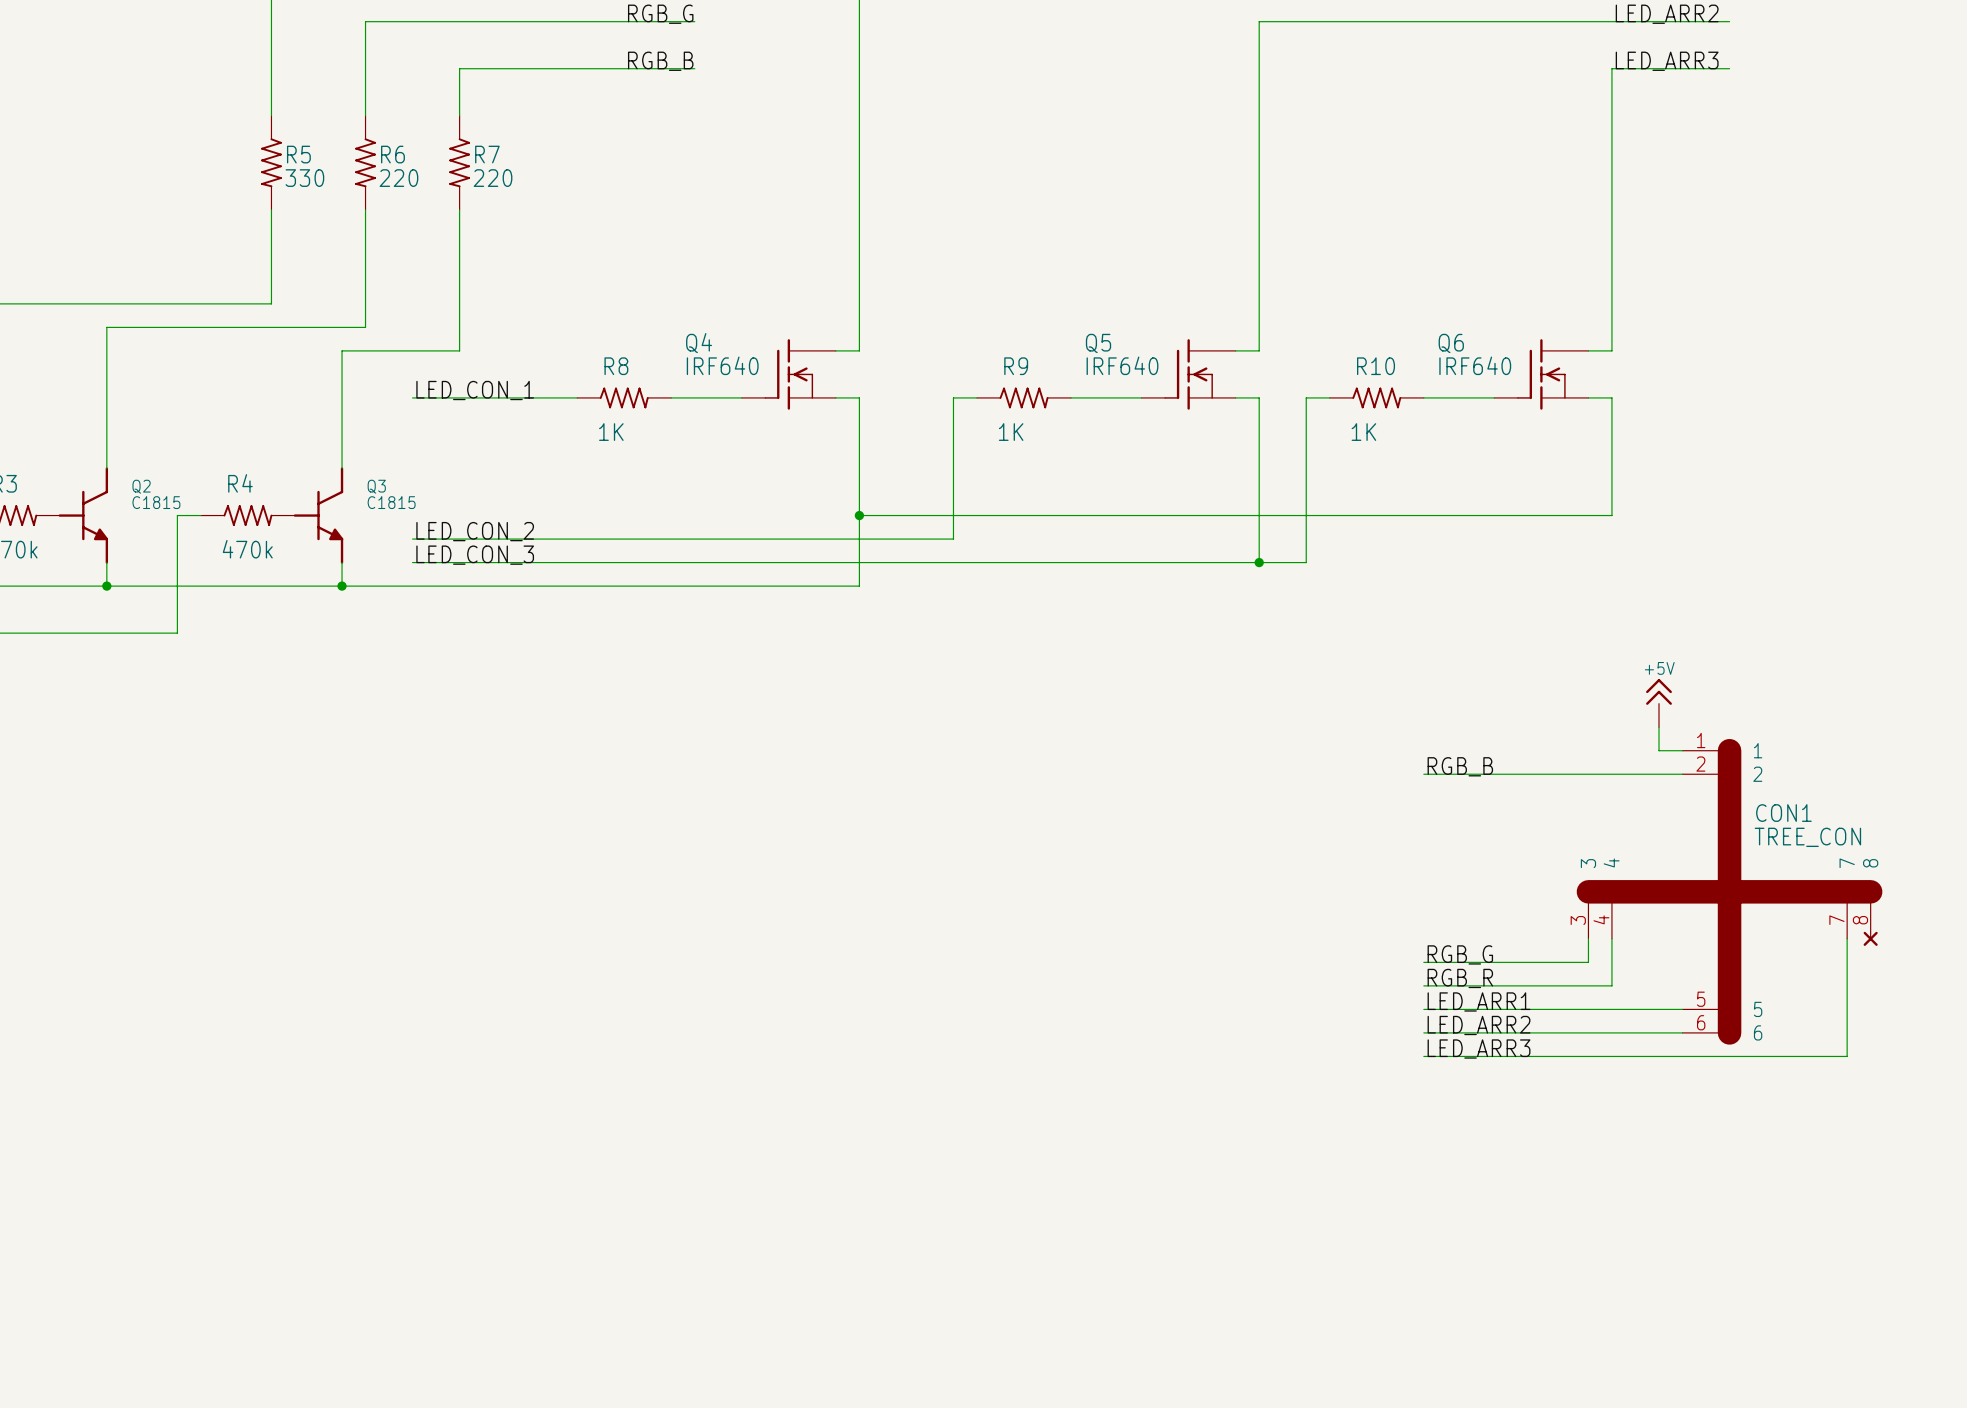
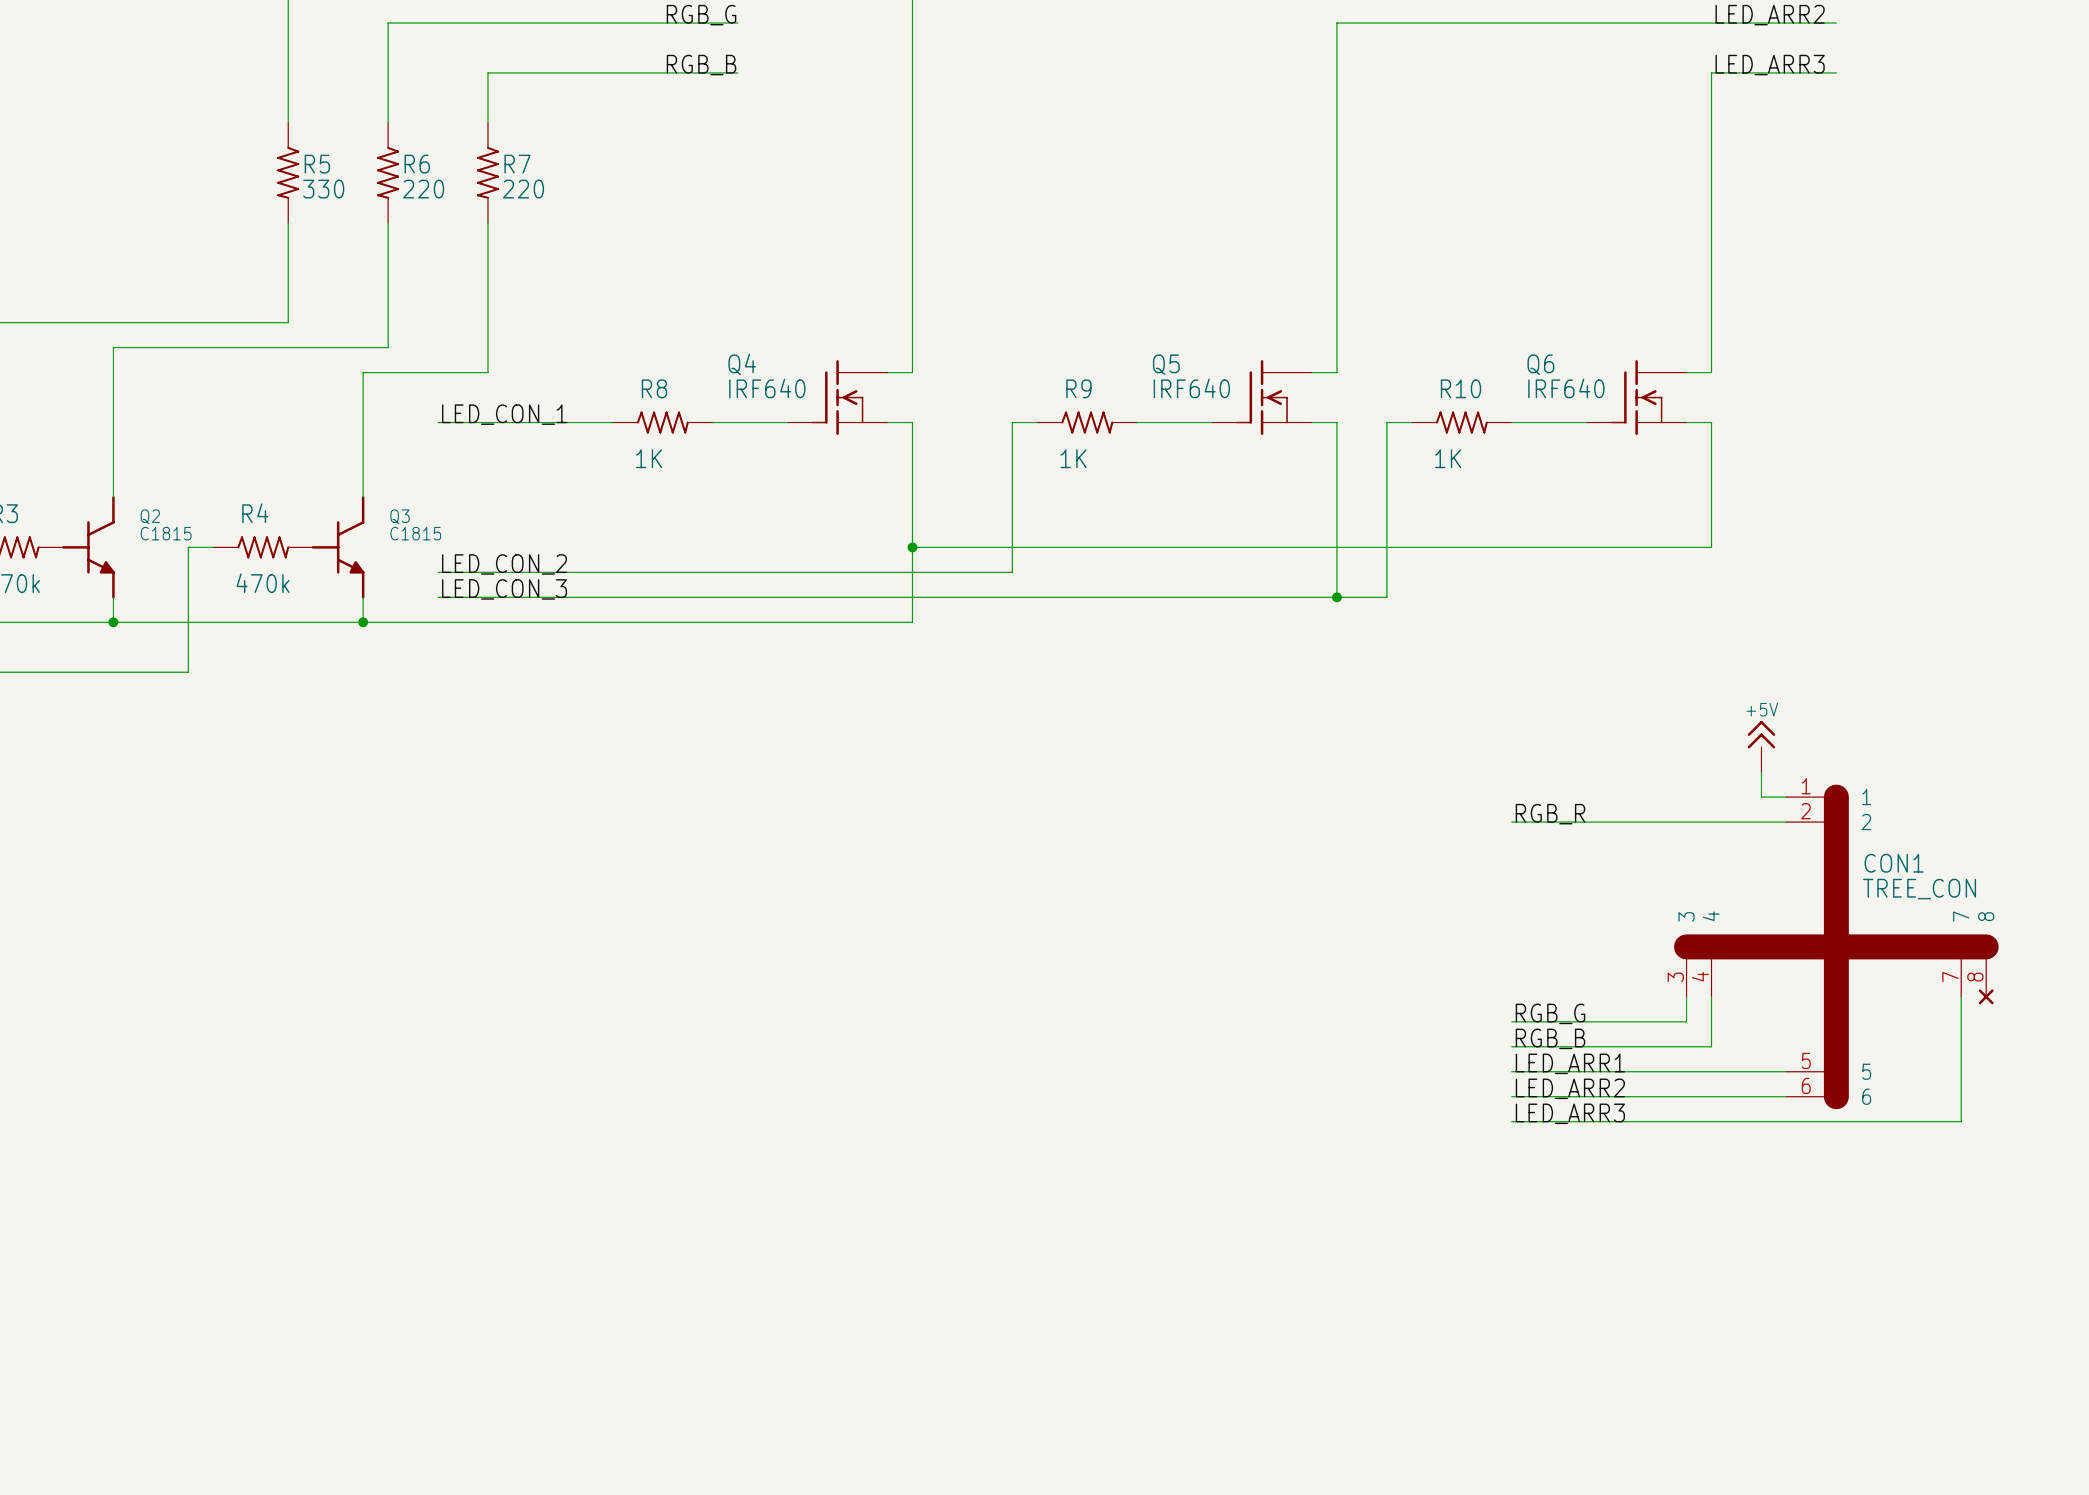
label: RGB_B (1460, 766) -> RGB_R (1550, 814)
label: RGB_R (1460, 978) -> RGB_B (1550, 1038)

